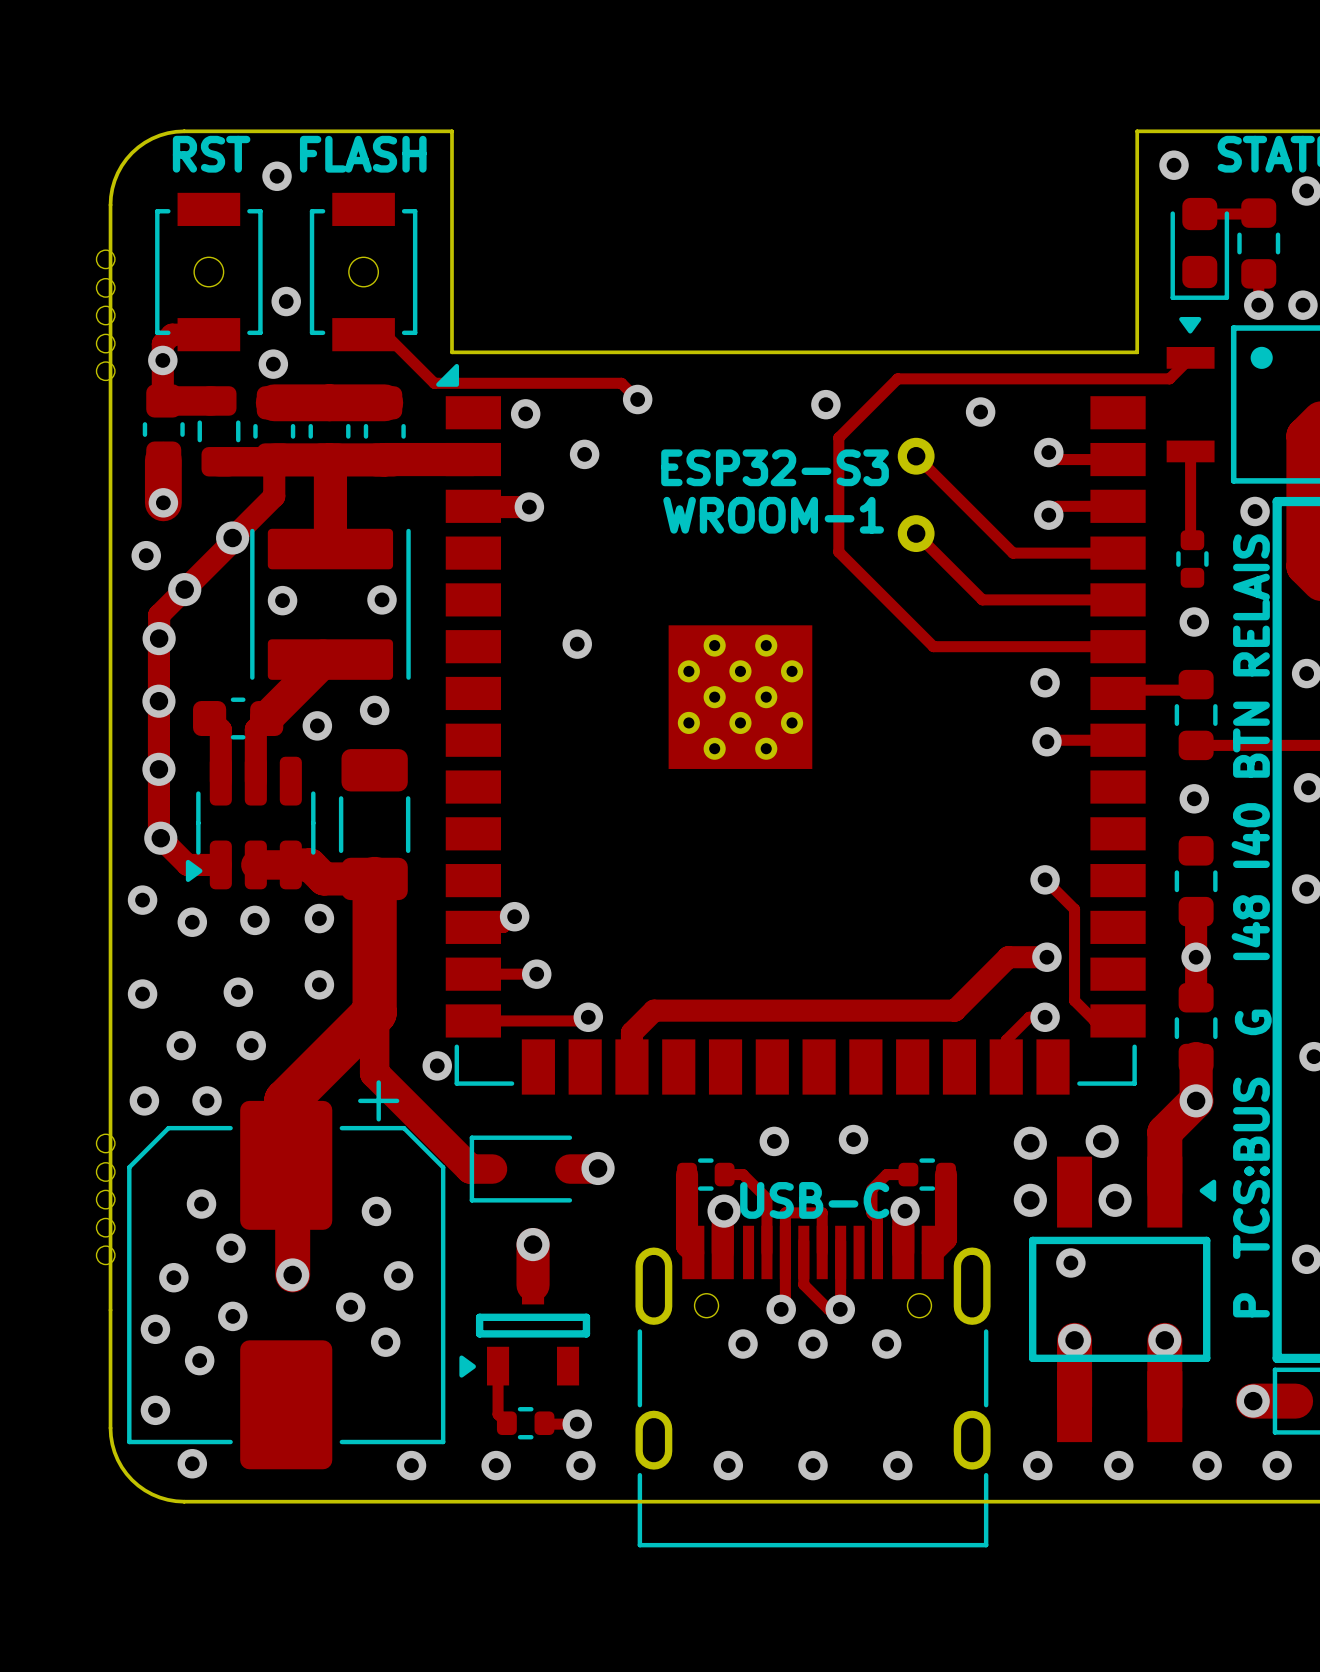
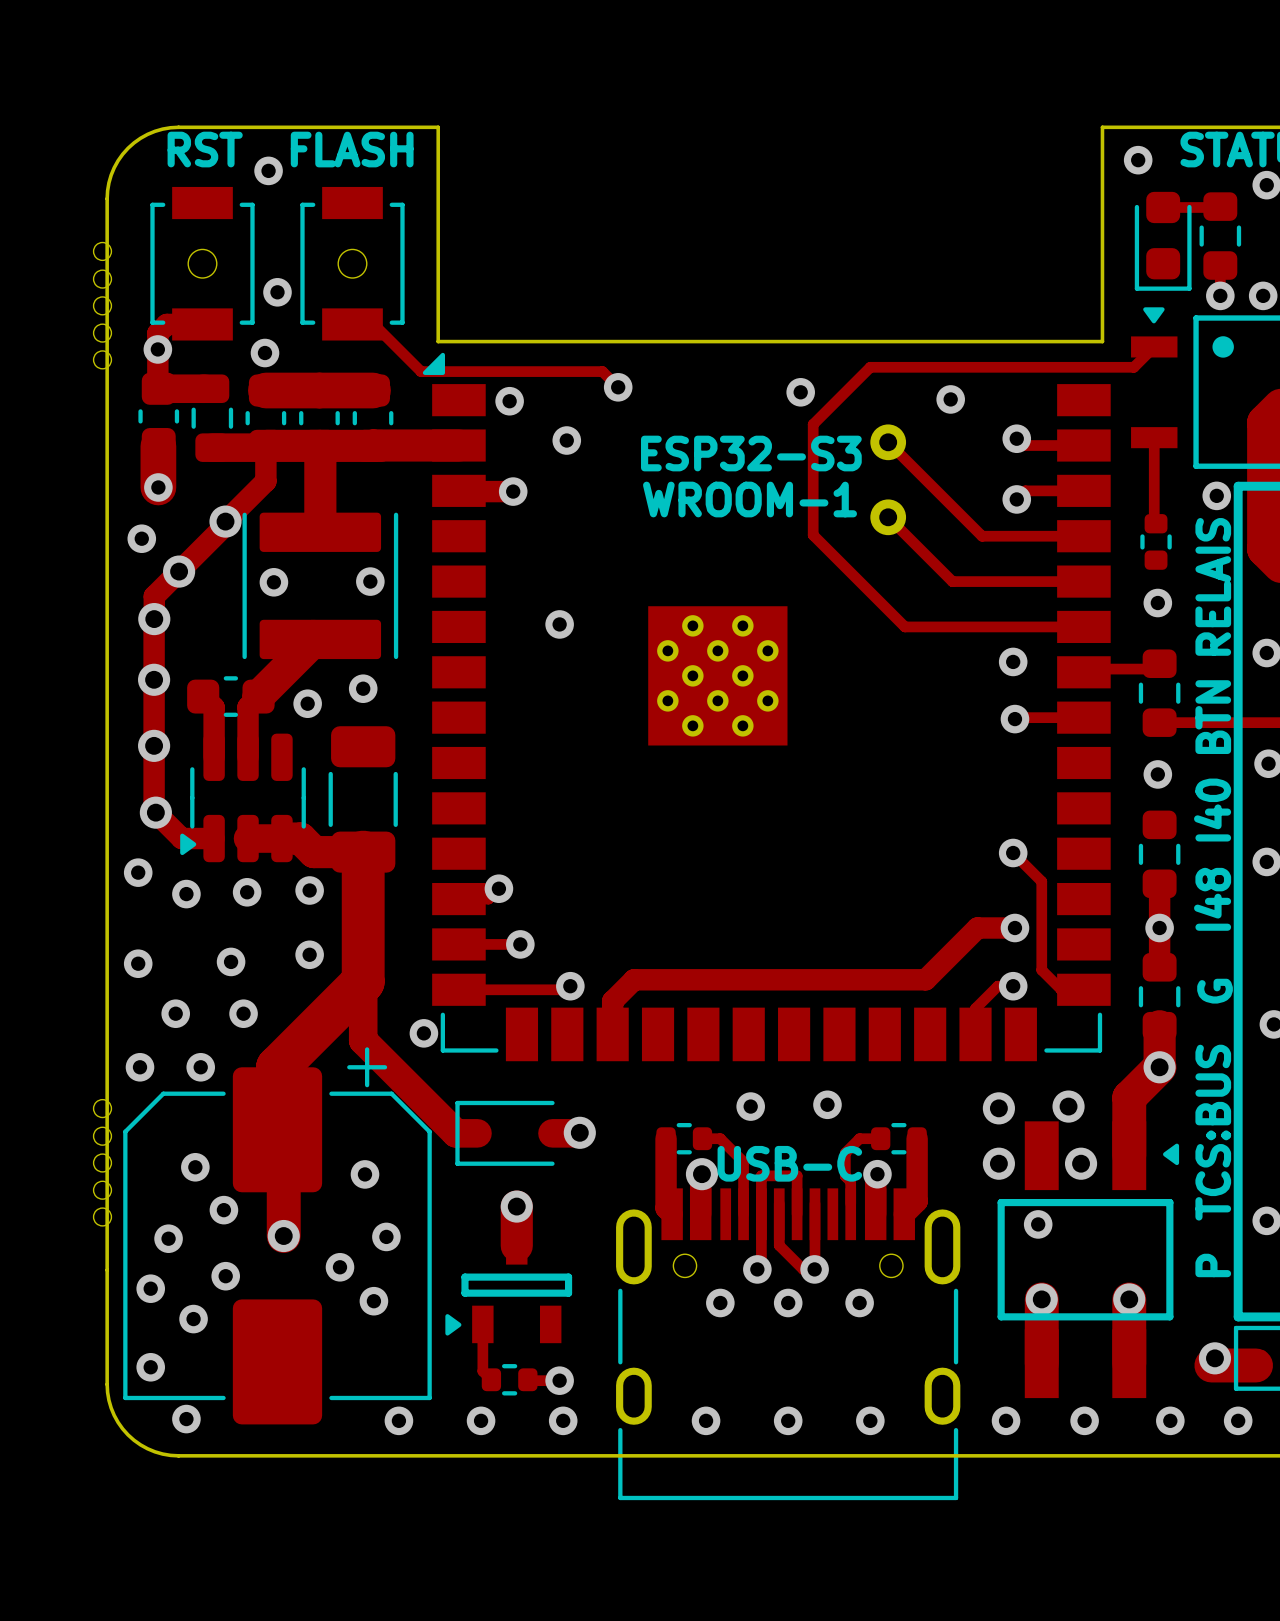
track: (1253, 1401) (1295, 1401) -> none
track: none -> (1211, 1365) (1256, 1365)

